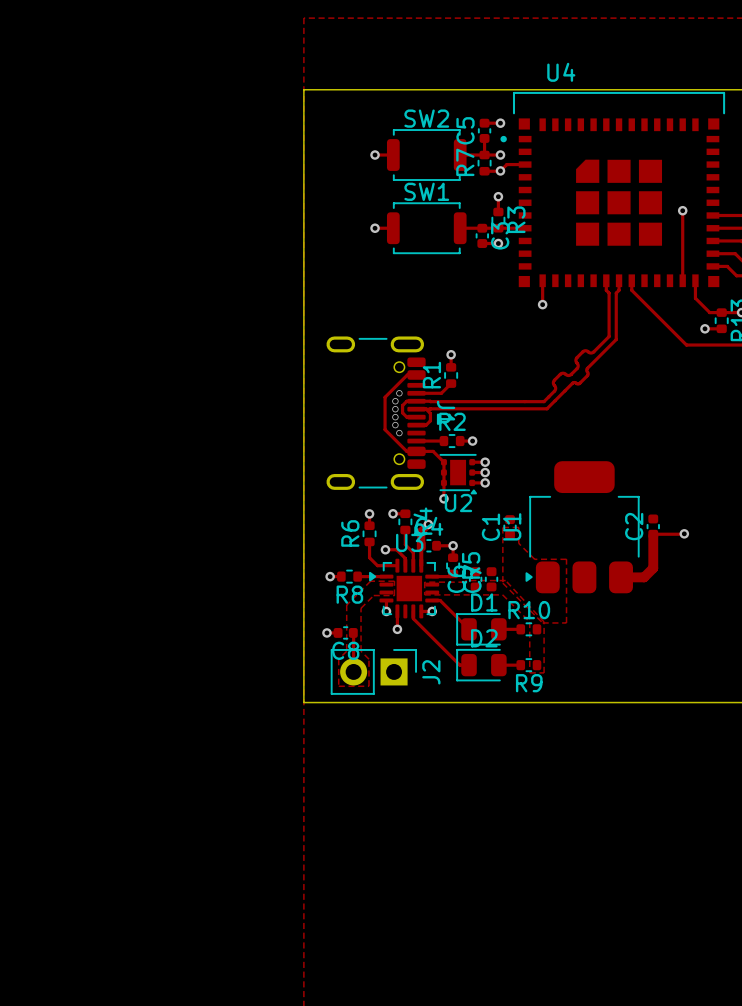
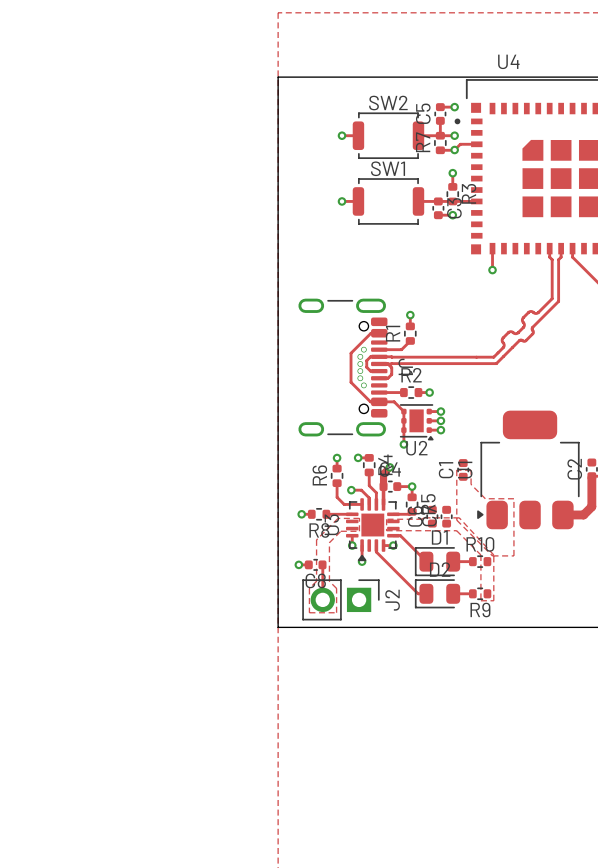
U3 rotation: 0° (404, 588) -> 90° counterclockwise (372, 529)

